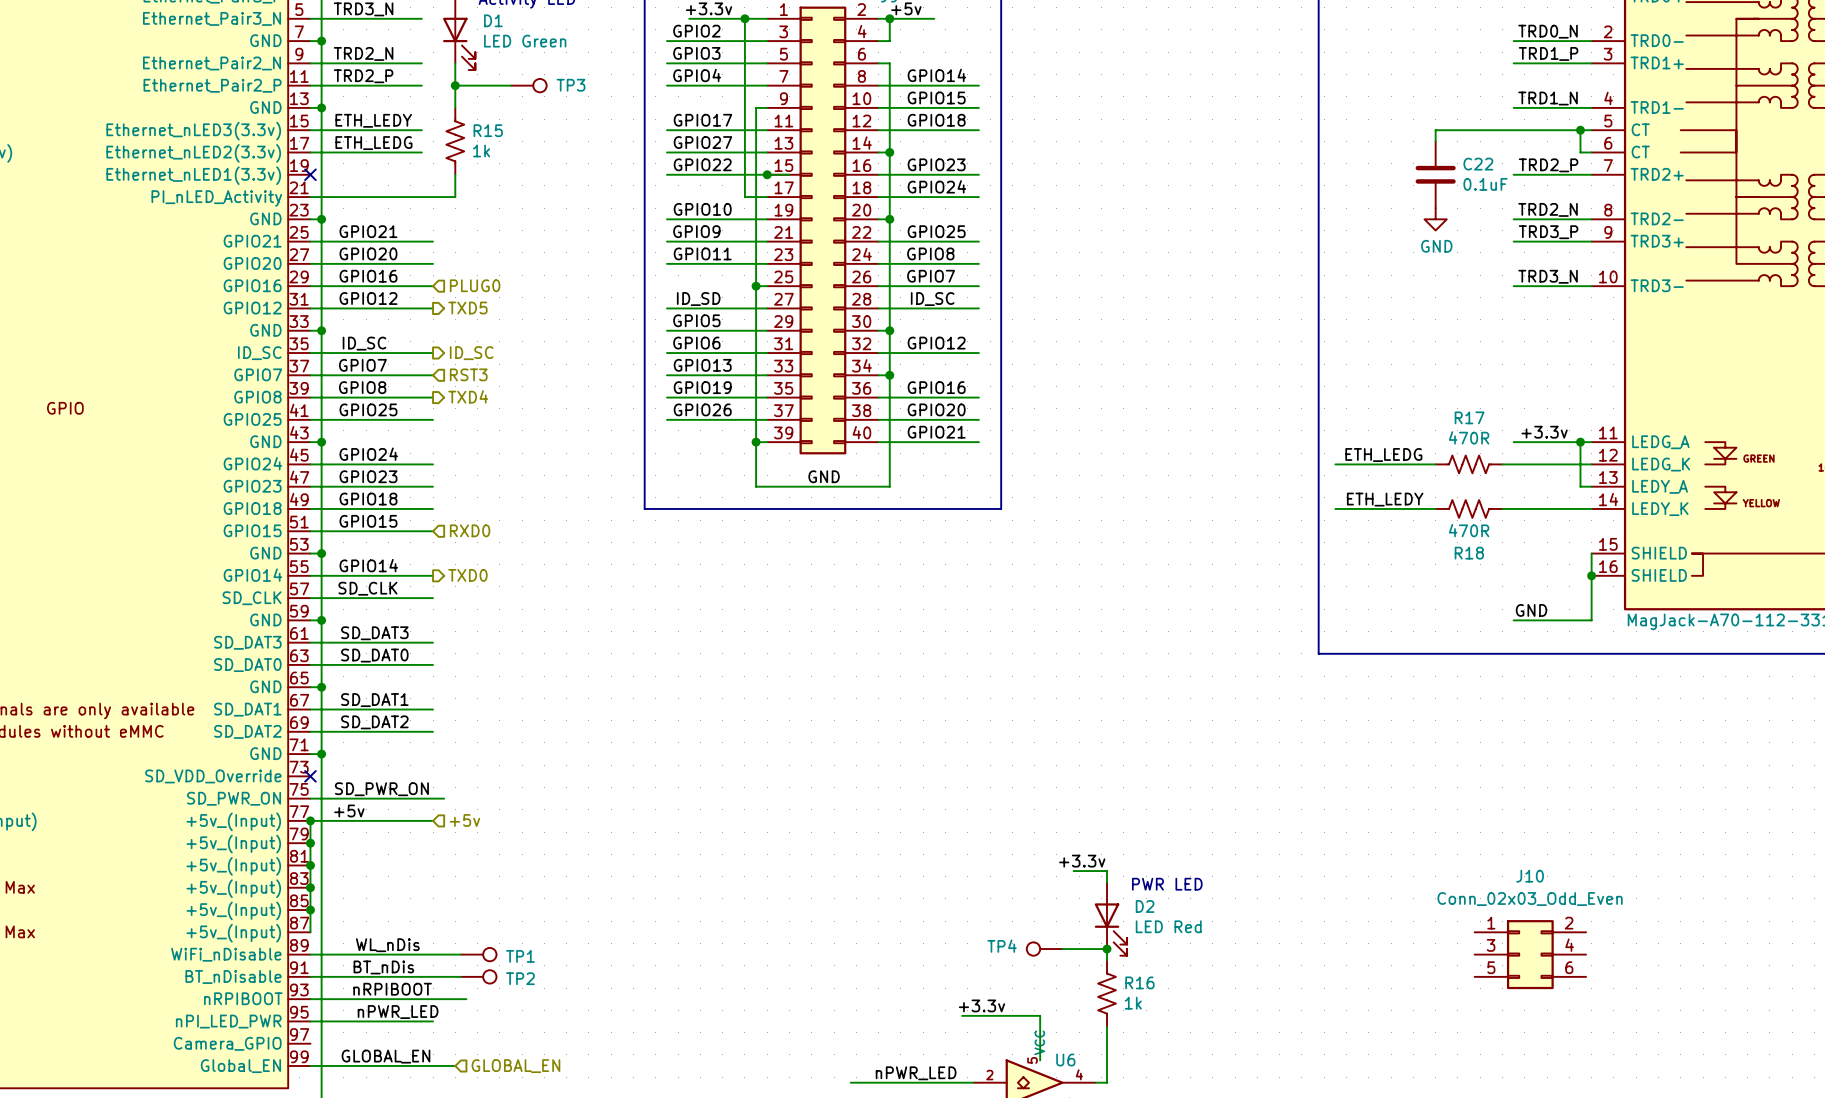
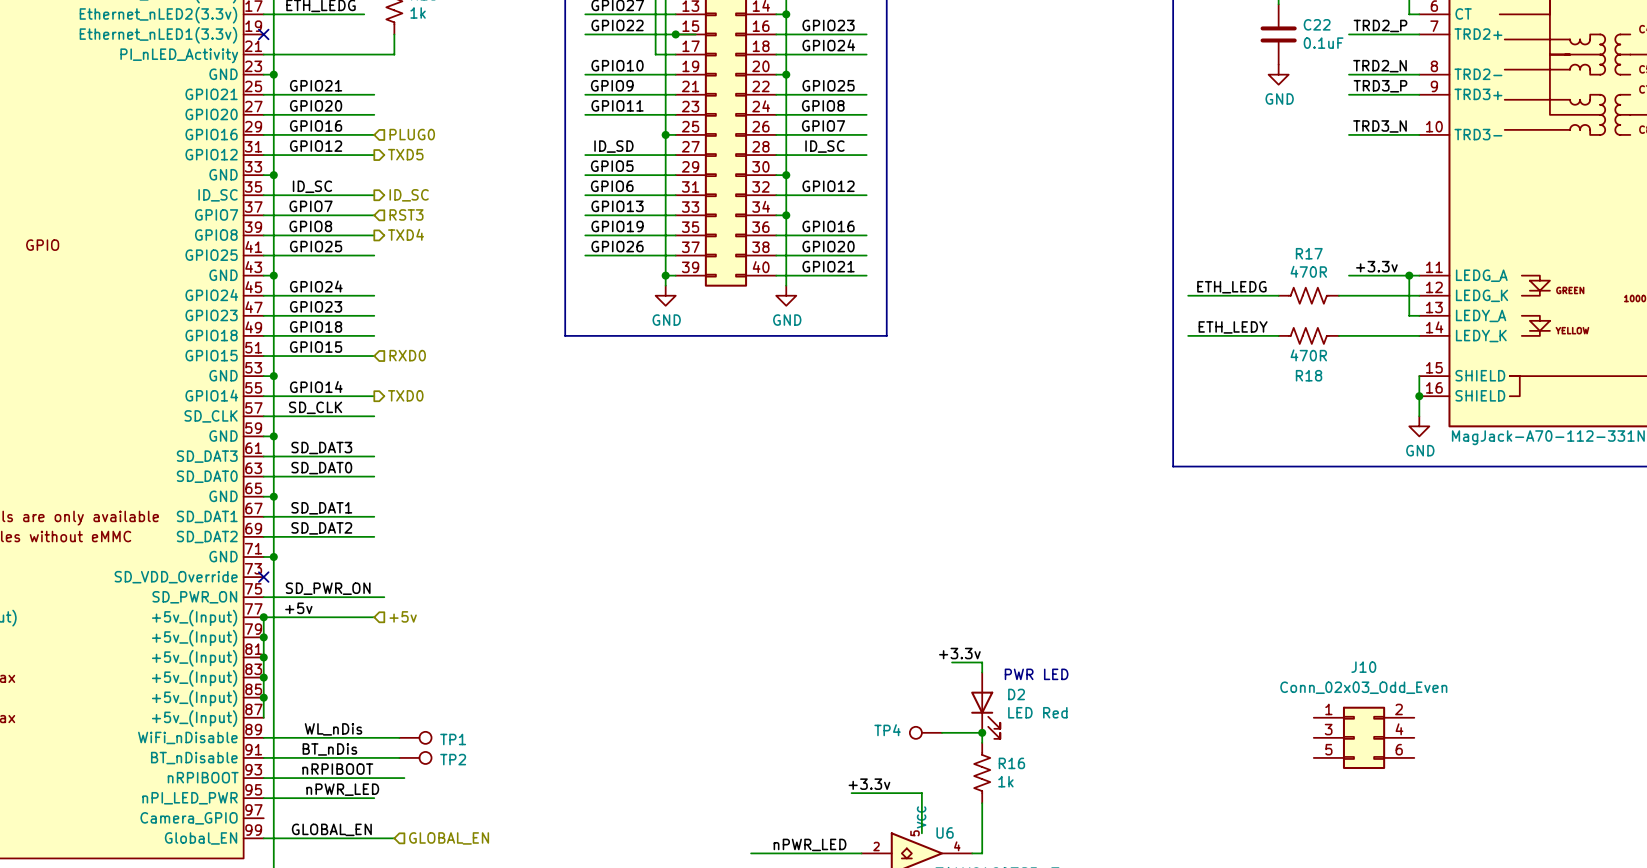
wire: (756, 453) (756, 486) (889, 486) (889, 453) -> none
power symbol: none -> GND (665, 295)
power symbol: none -> GND (786, 295)
label: GND (824, 476) -> none
wire: (1591, 598) (1591, 620) (1513, 620) -> none
power symbol: none -> GND (1419, 426)
label: GND (1531, 610) -> none

